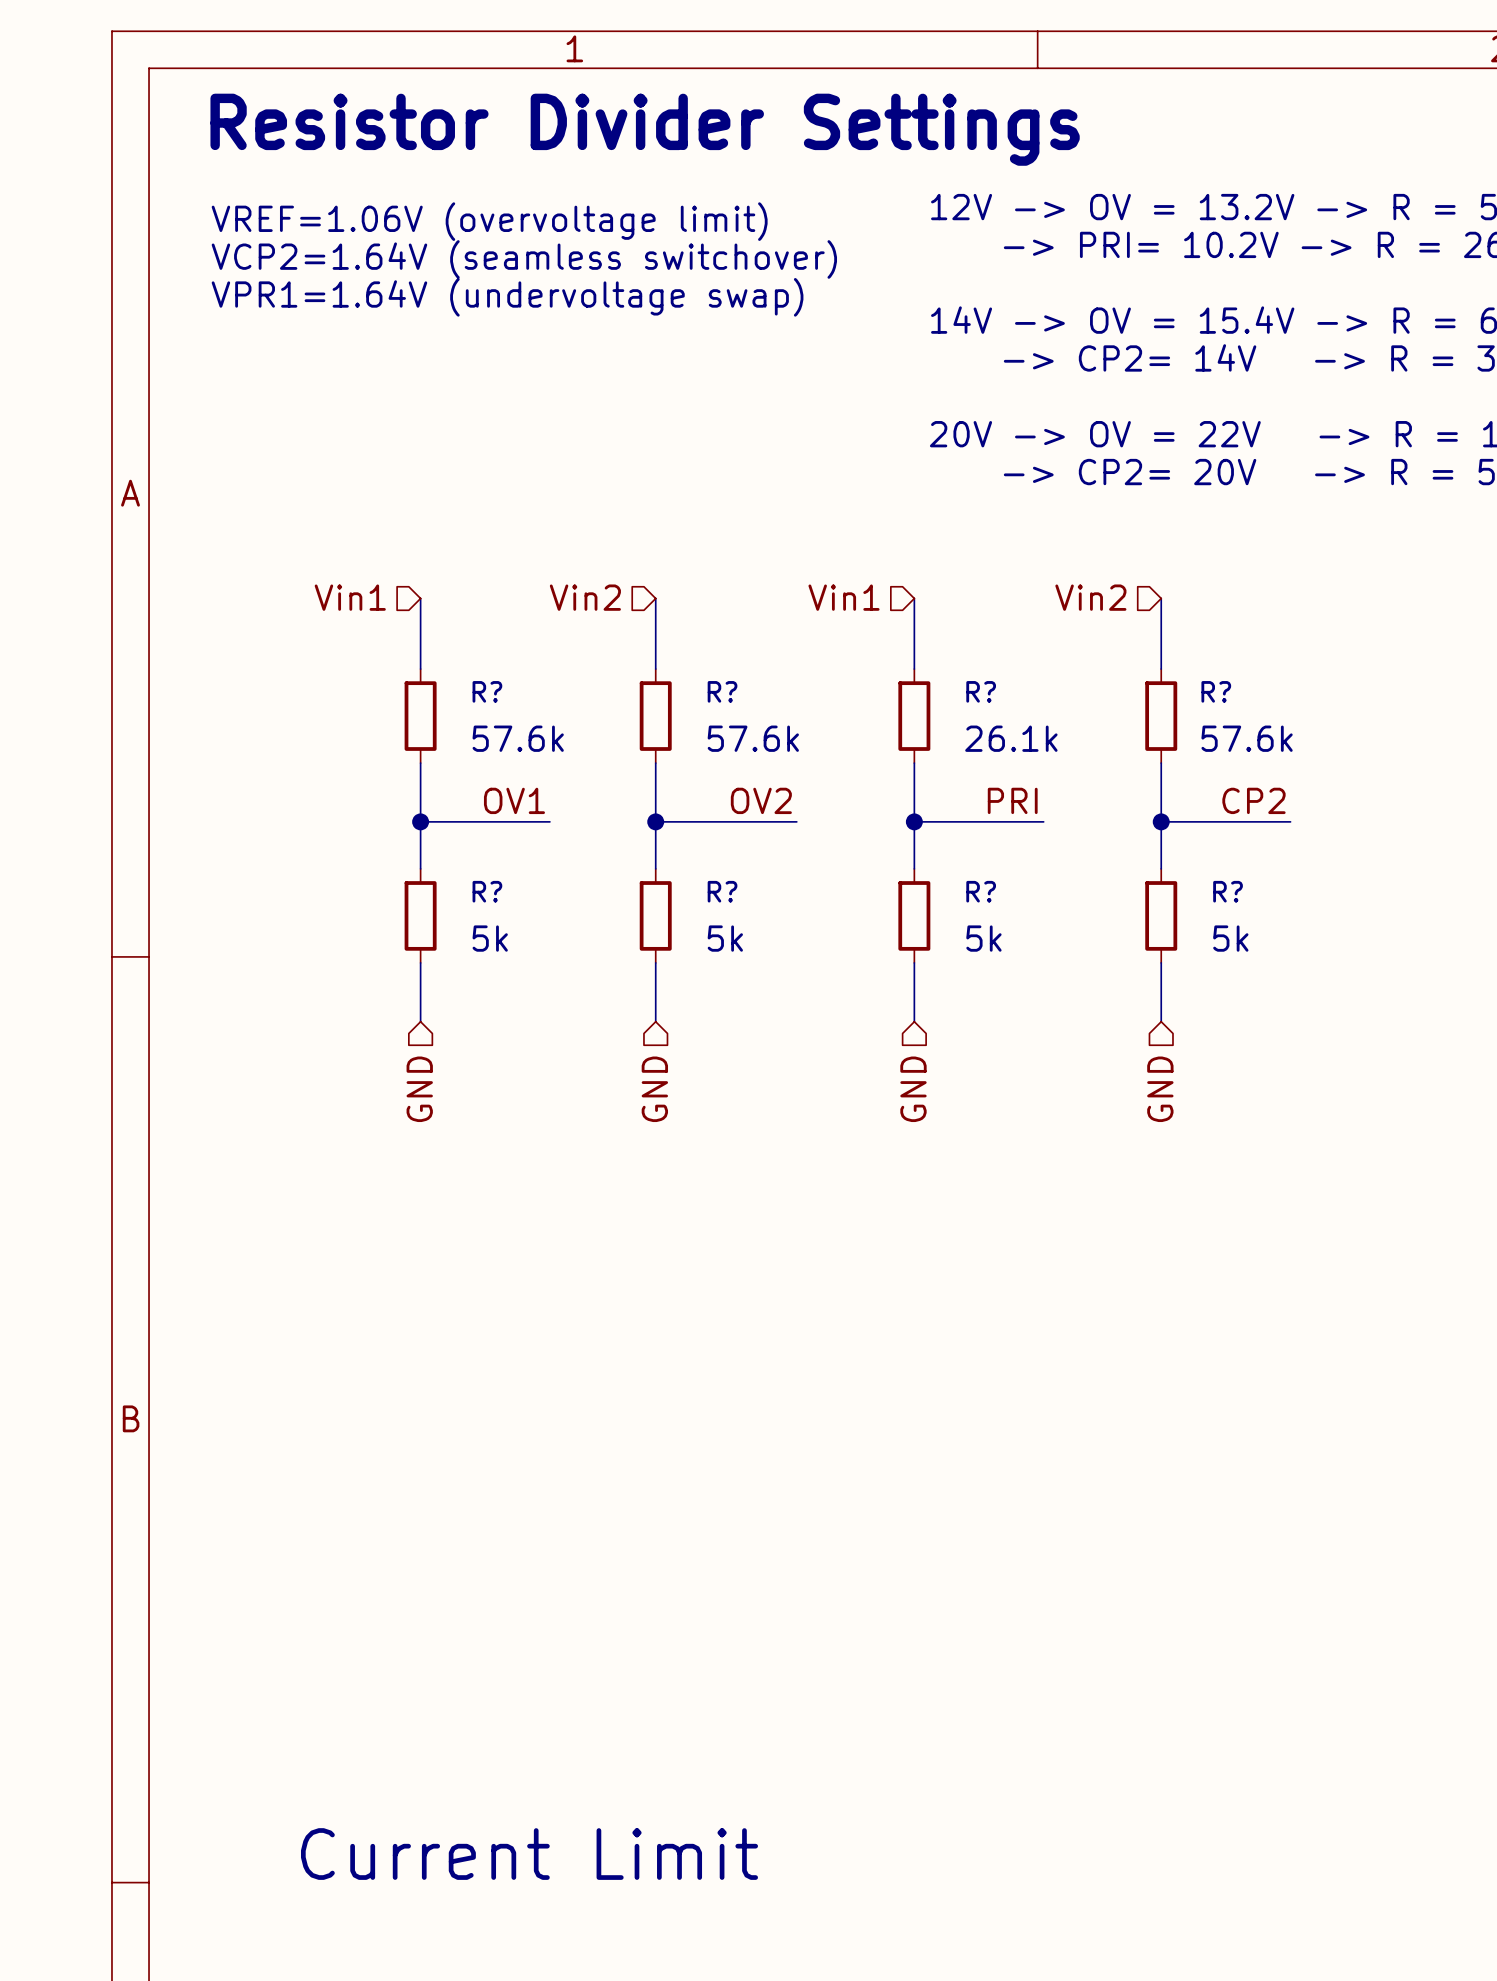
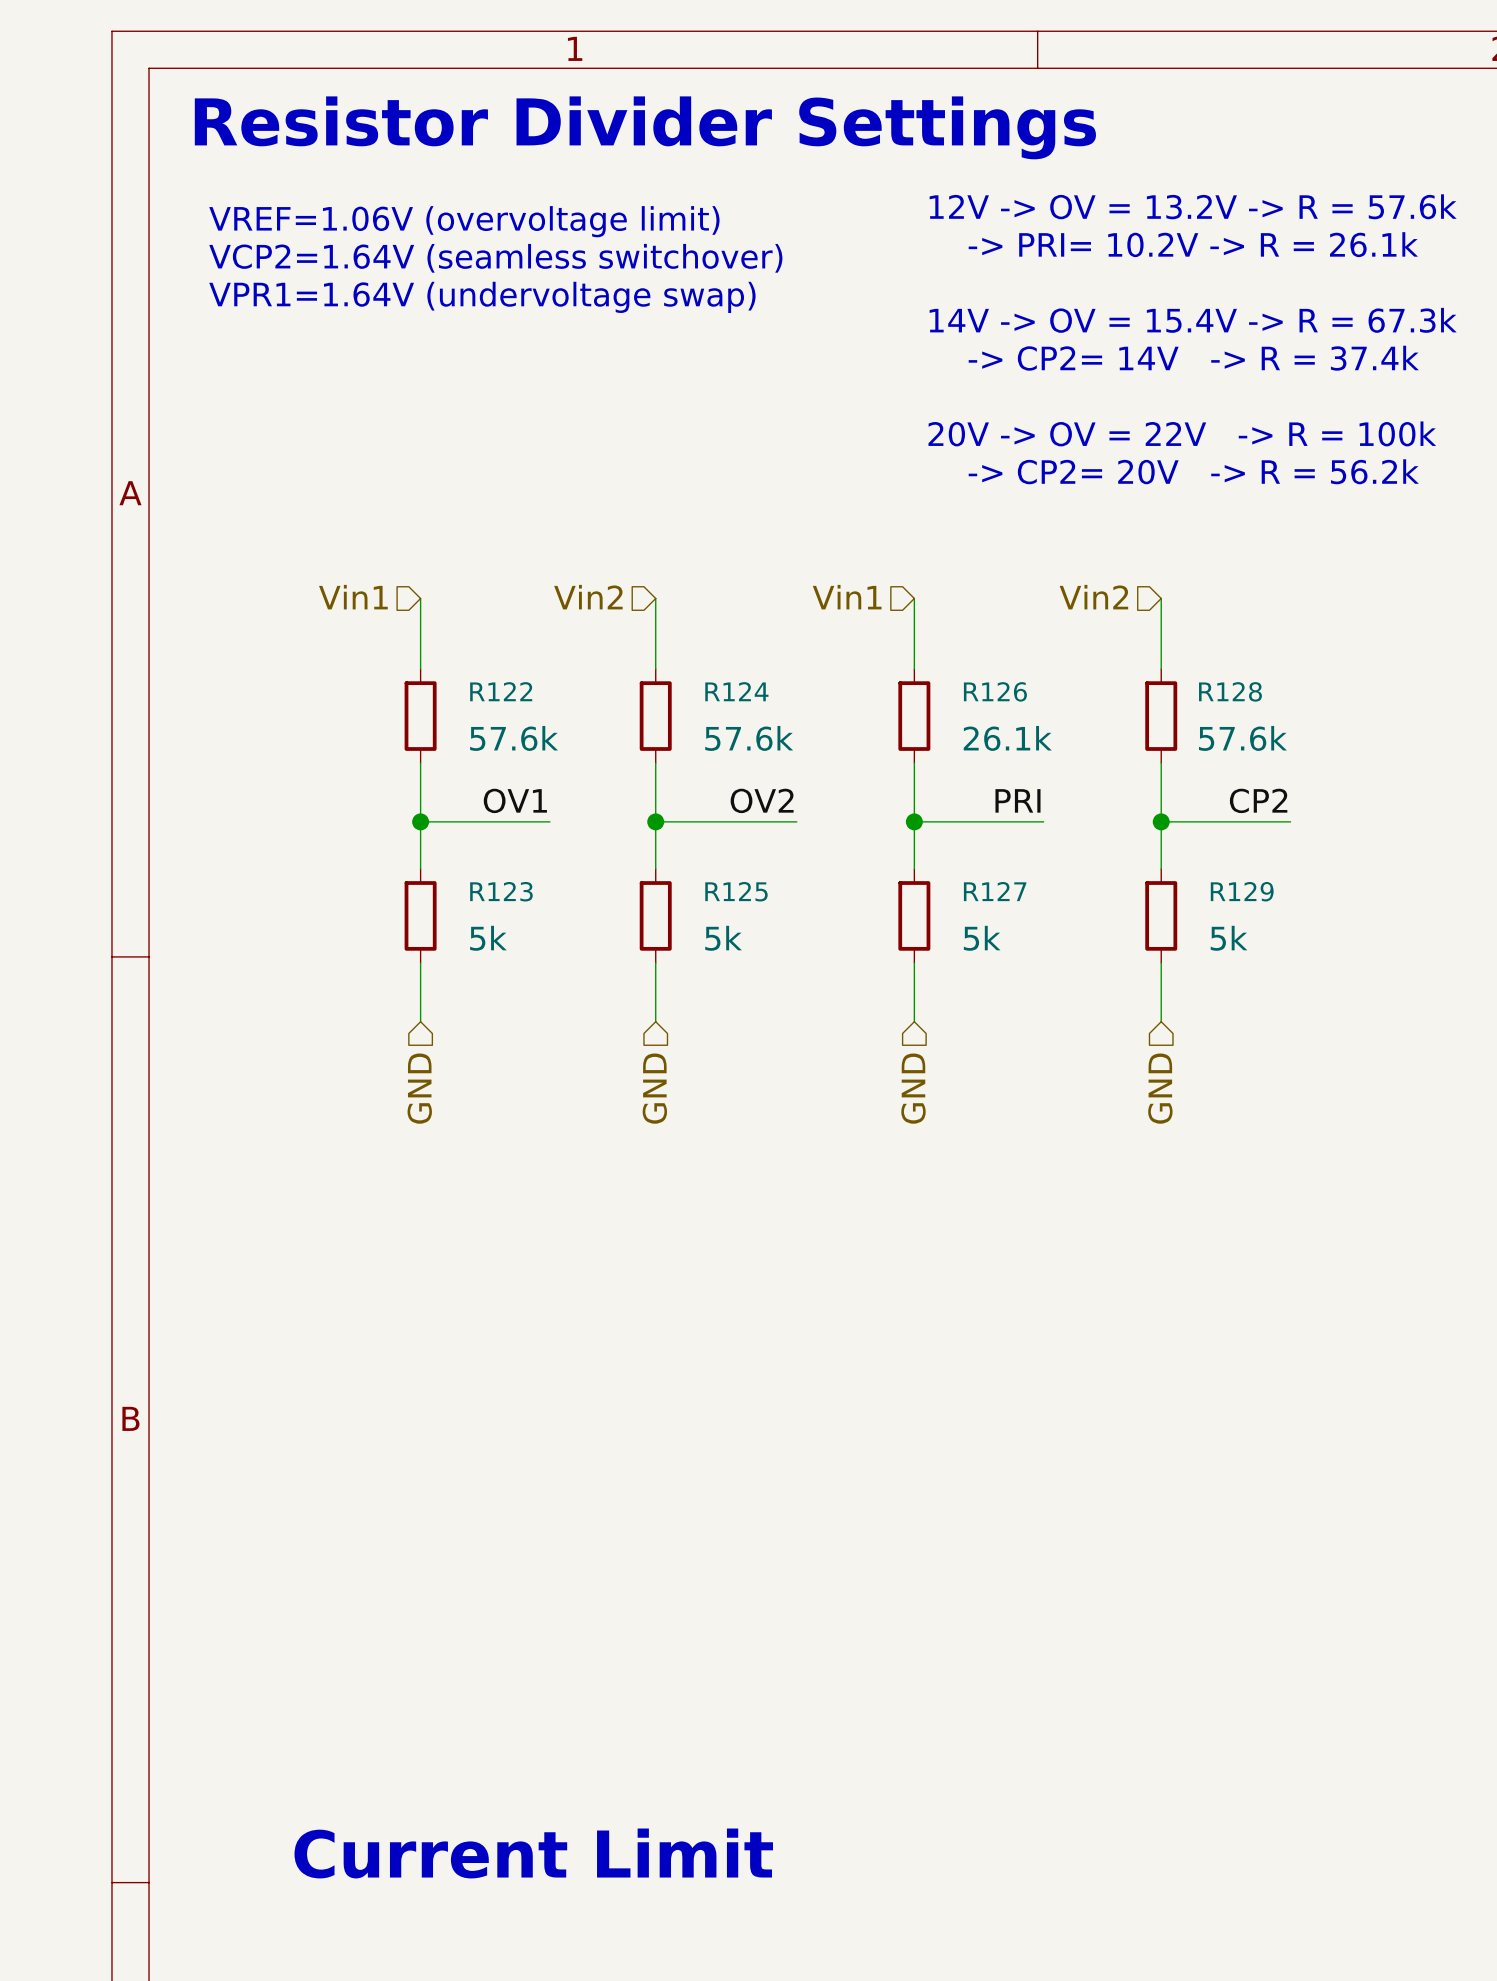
R? name: R? (487, 691) -> R122 (501, 691)
R? name: R? (722, 691) -> R124 (736, 691)
R? name: R? (981, 691) -> R126 (995, 691)
R? name: R? (1216, 691) -> R128 (1230, 691)
R? name: R? (487, 891) -> R123 (501, 891)
R? name: R? (722, 891) -> R125 (736, 891)
R? name: R? (981, 891) -> R127 (995, 891)
R? name: R? (1228, 891) -> R129 (1242, 891)

